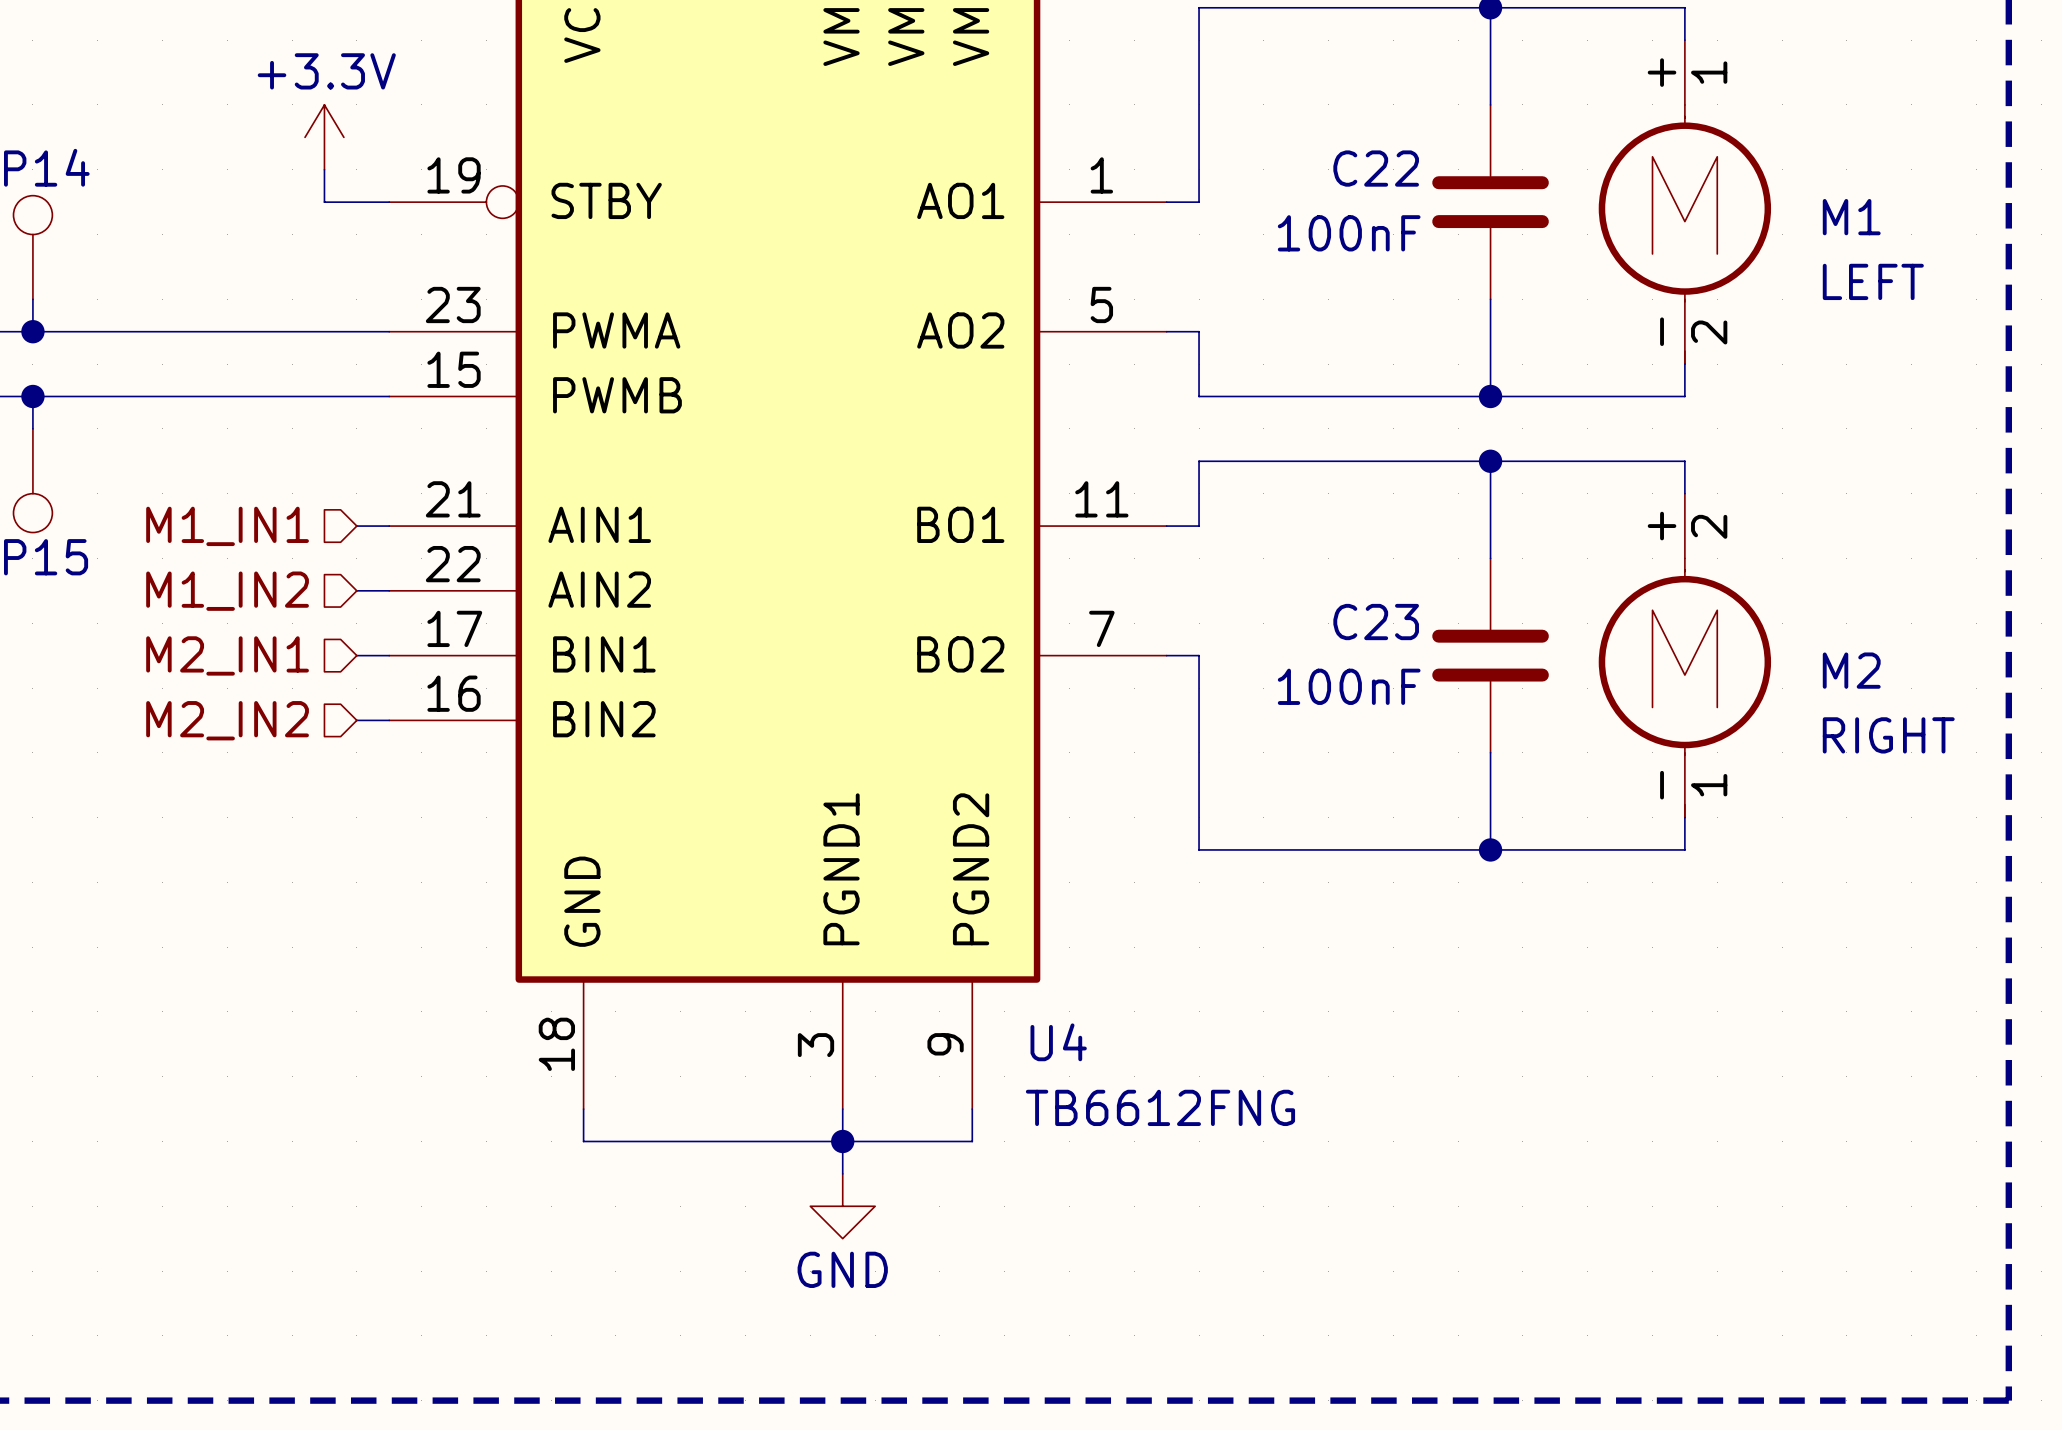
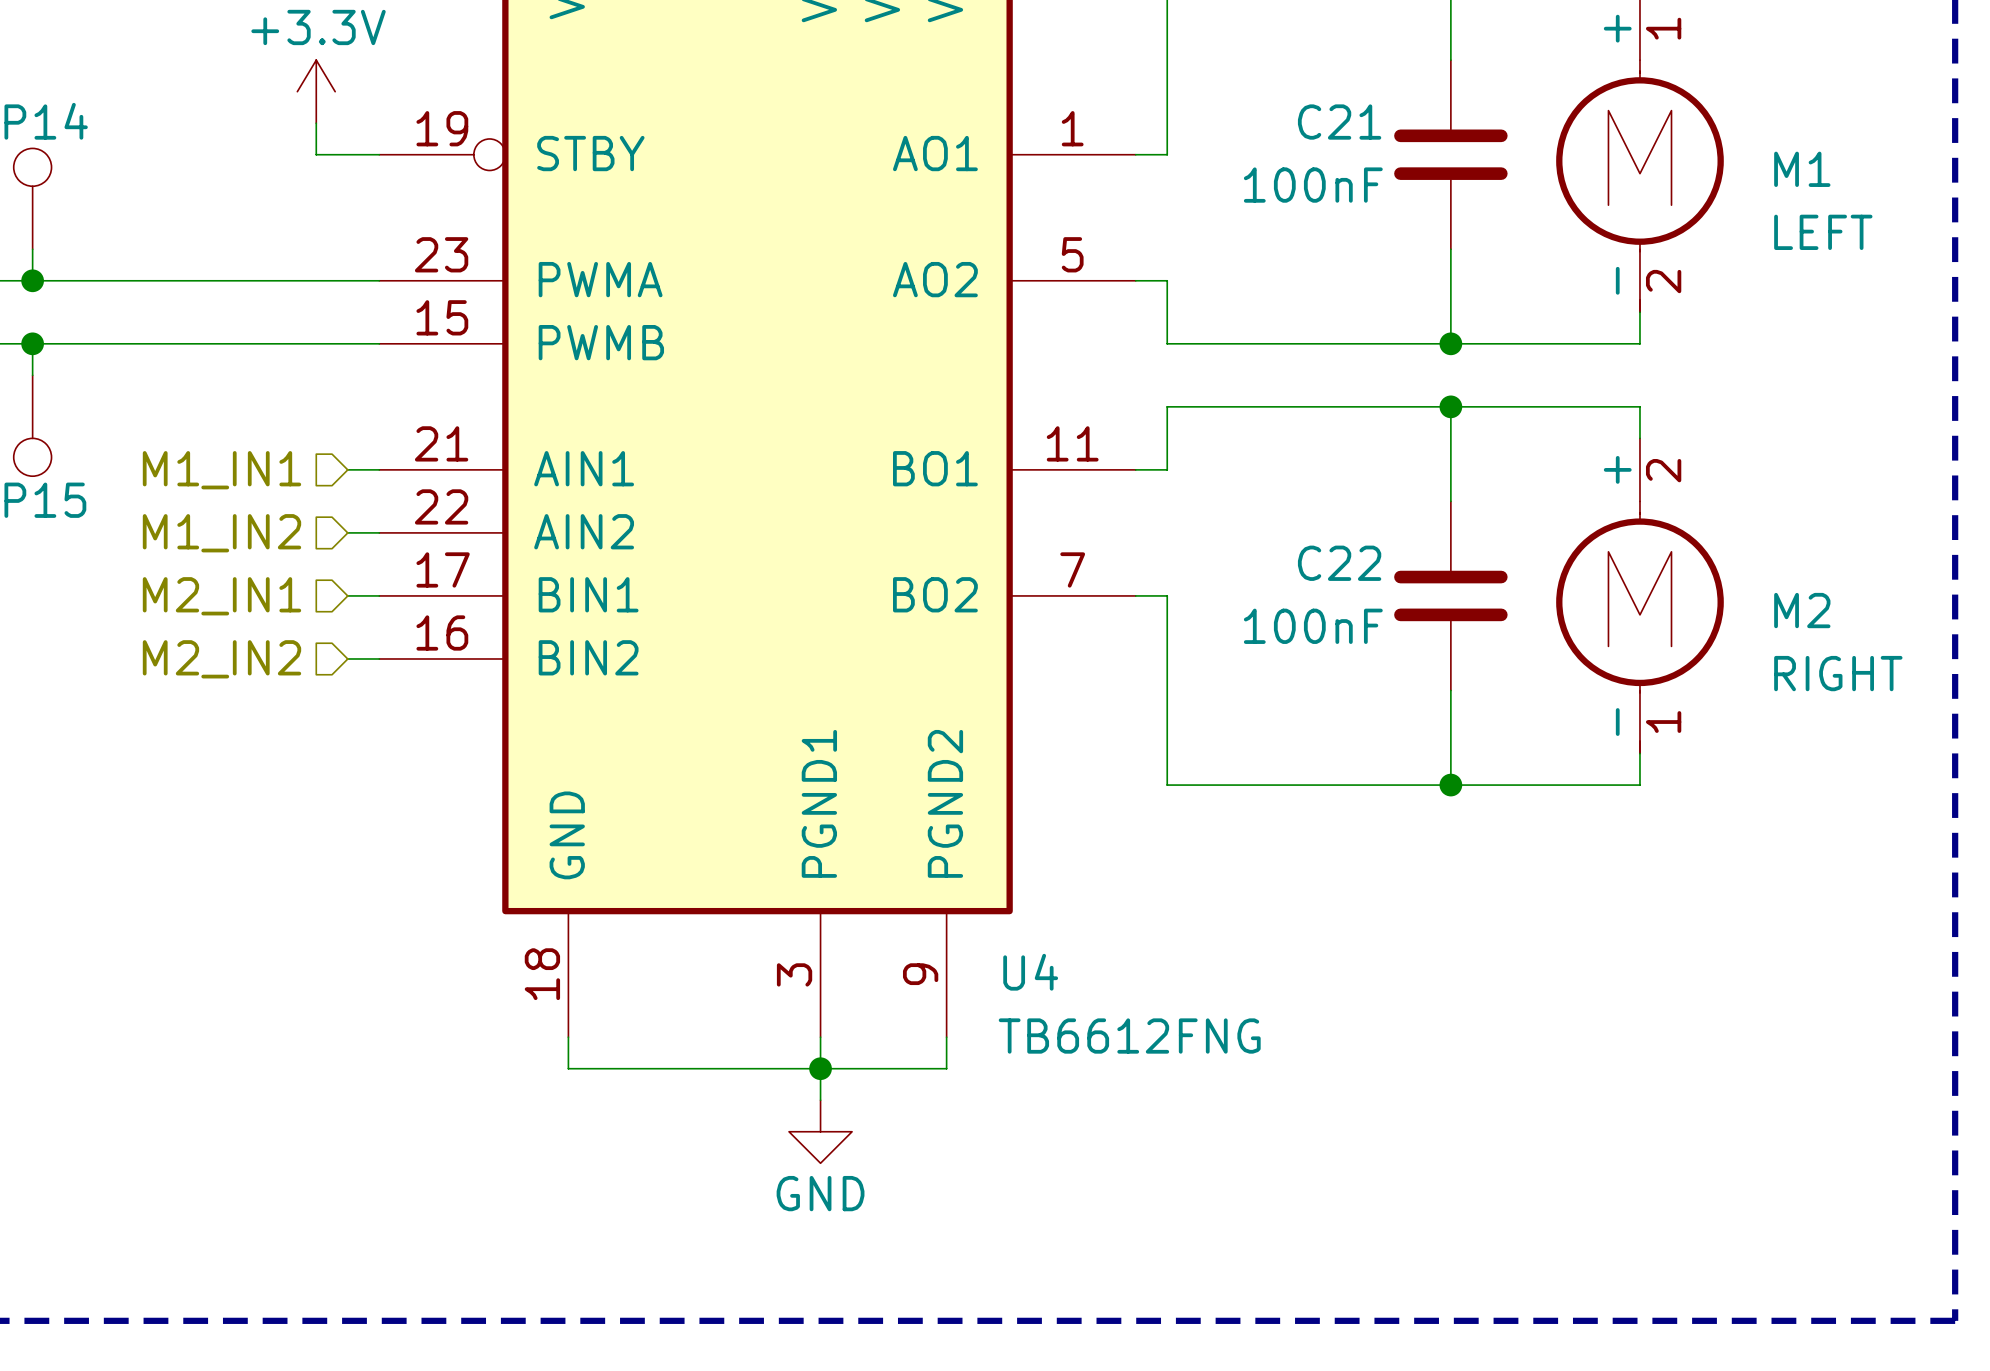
C22 name: C22 (1376, 168) -> C21 (1339, 122)
C23 name: C23 (1376, 622) -> C22 (1339, 563)

